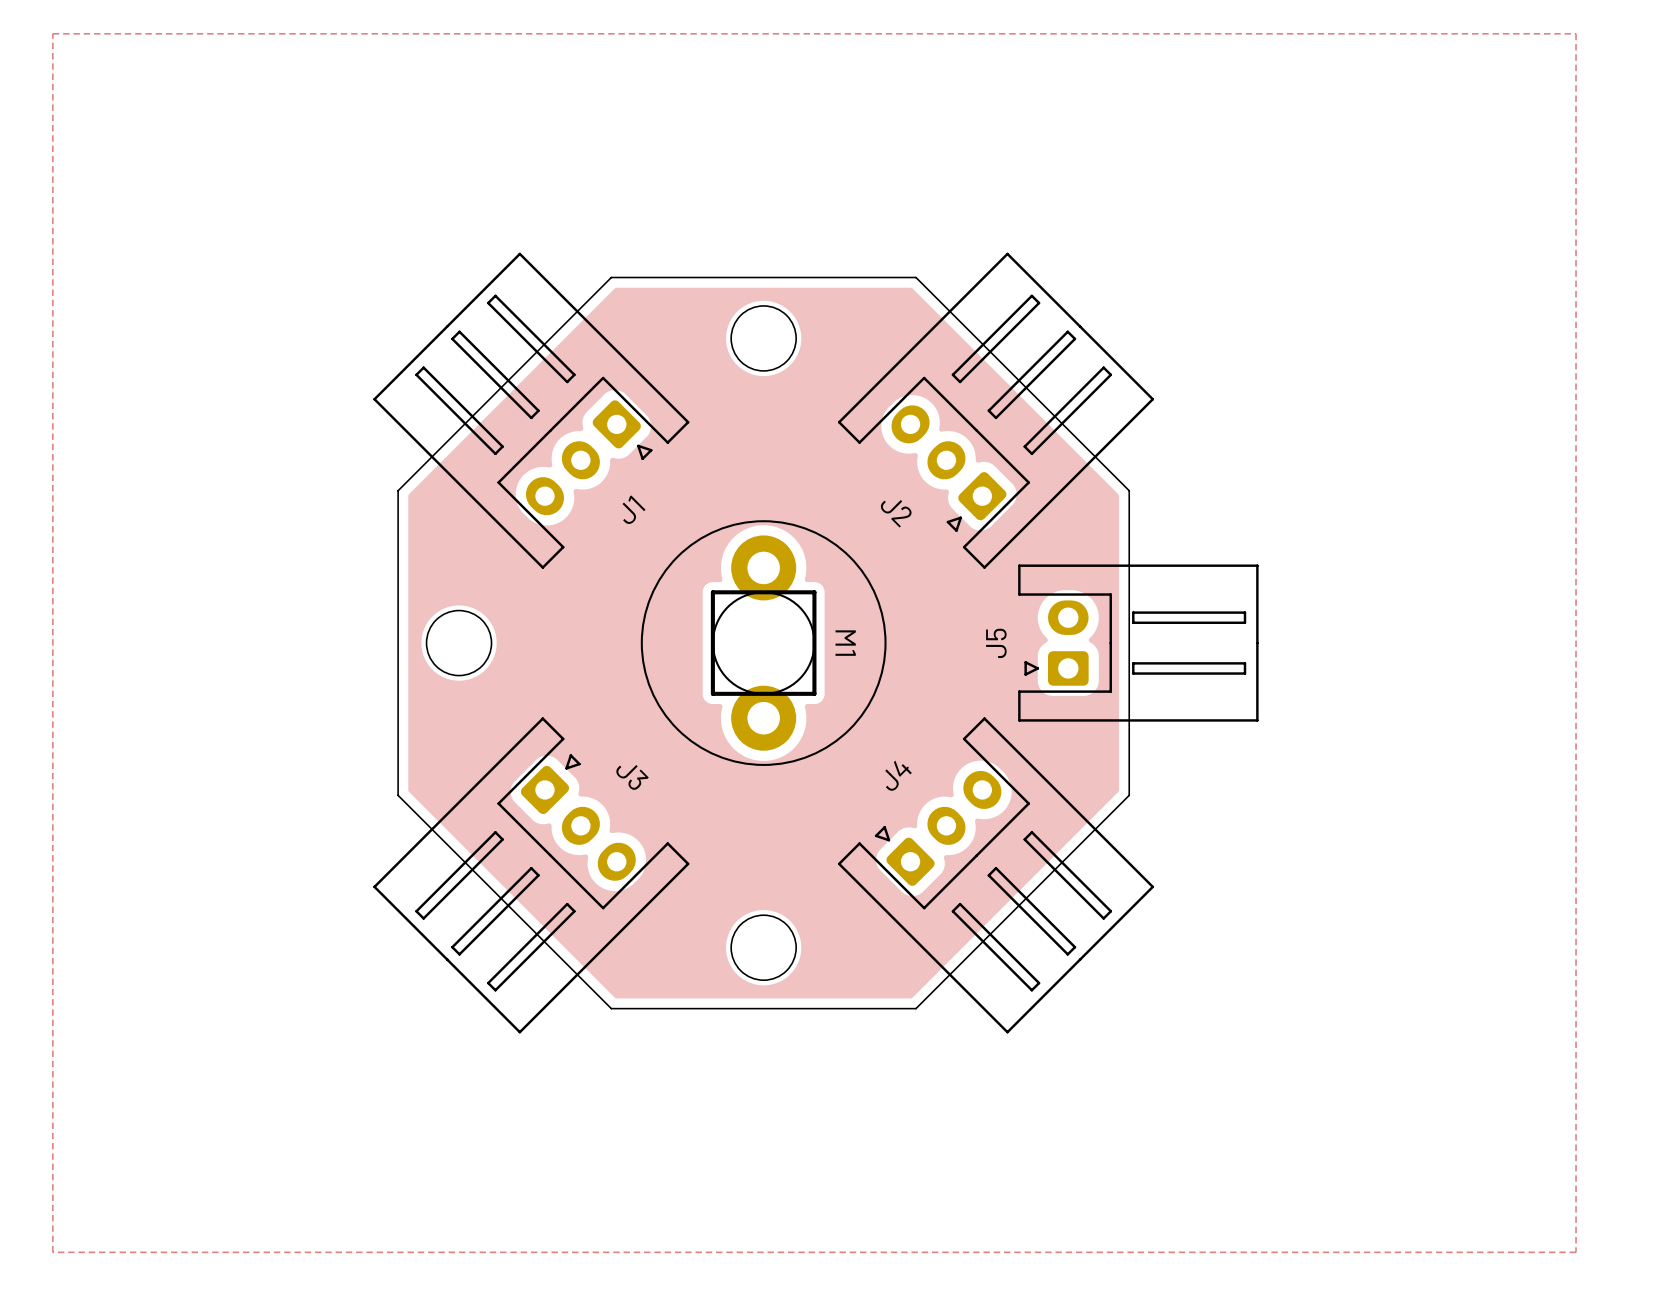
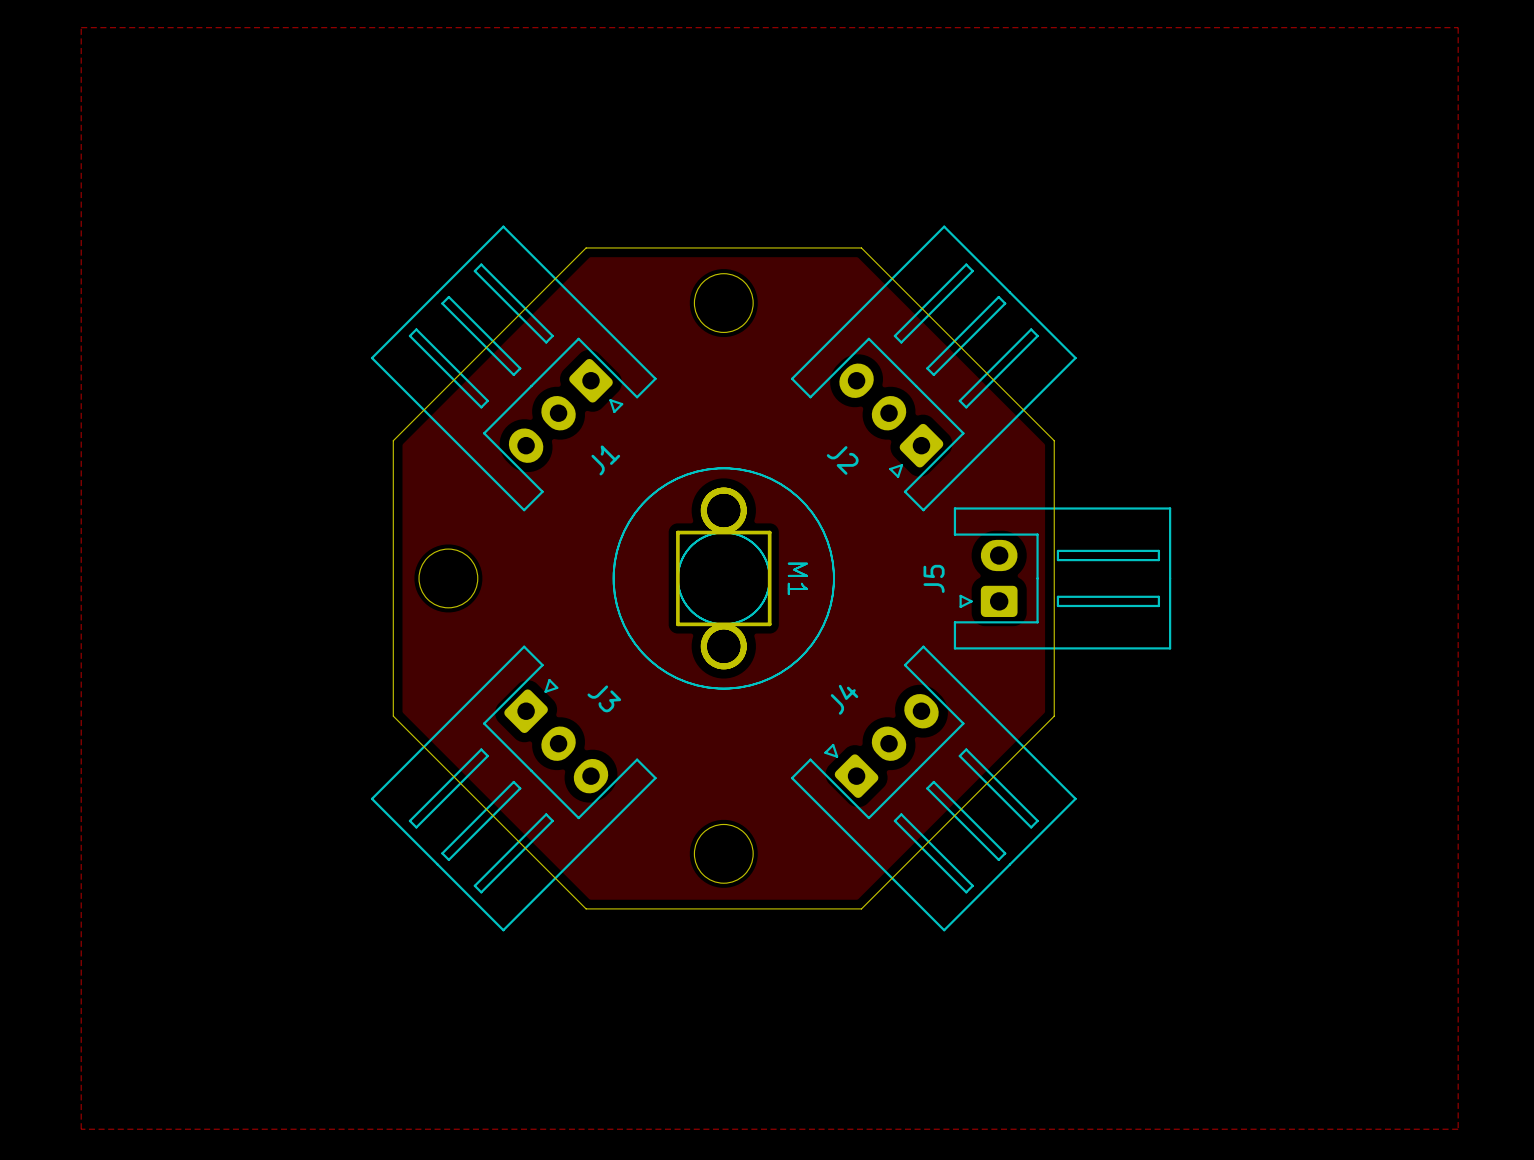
M1 footprint: [640, 520, 887, 766] -> [612, 467, 835, 690]

